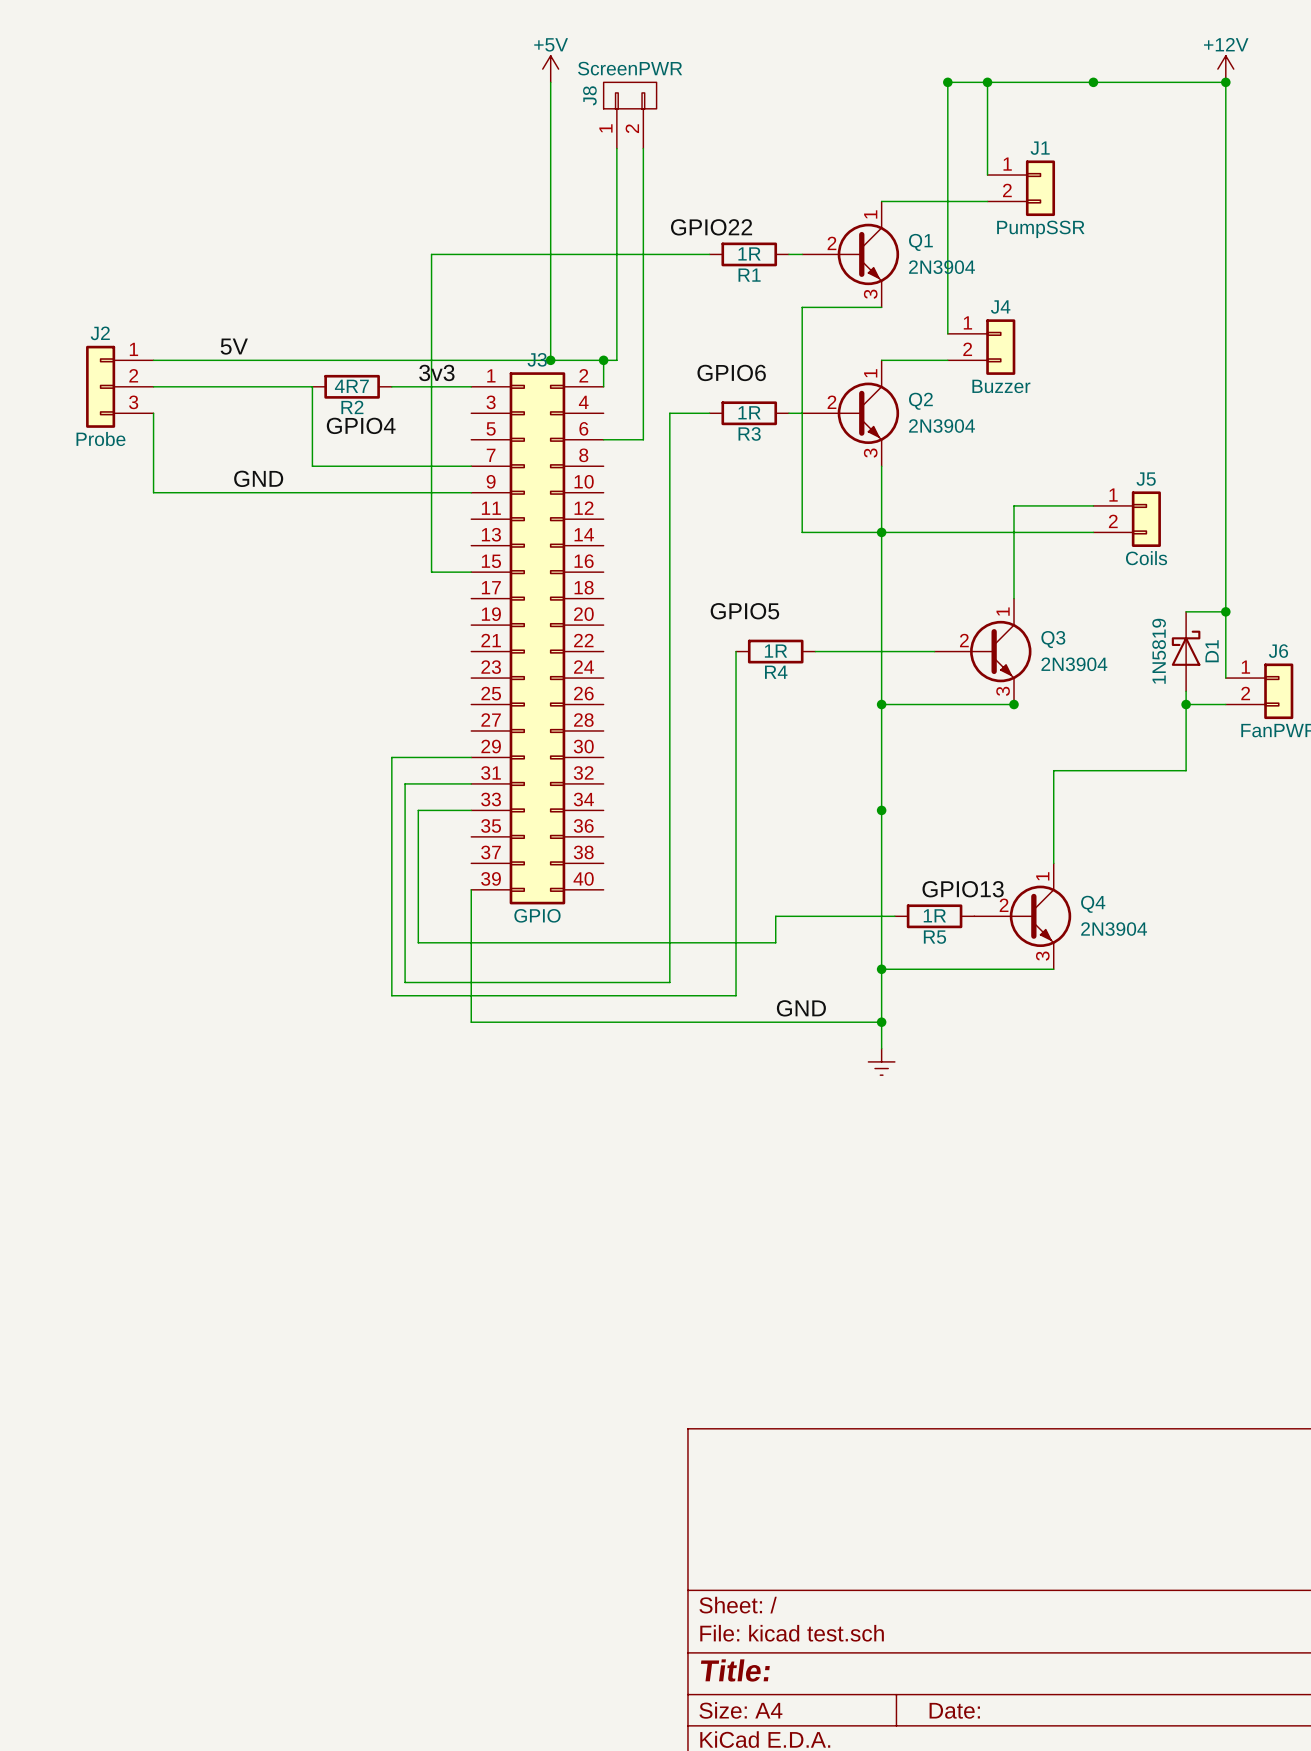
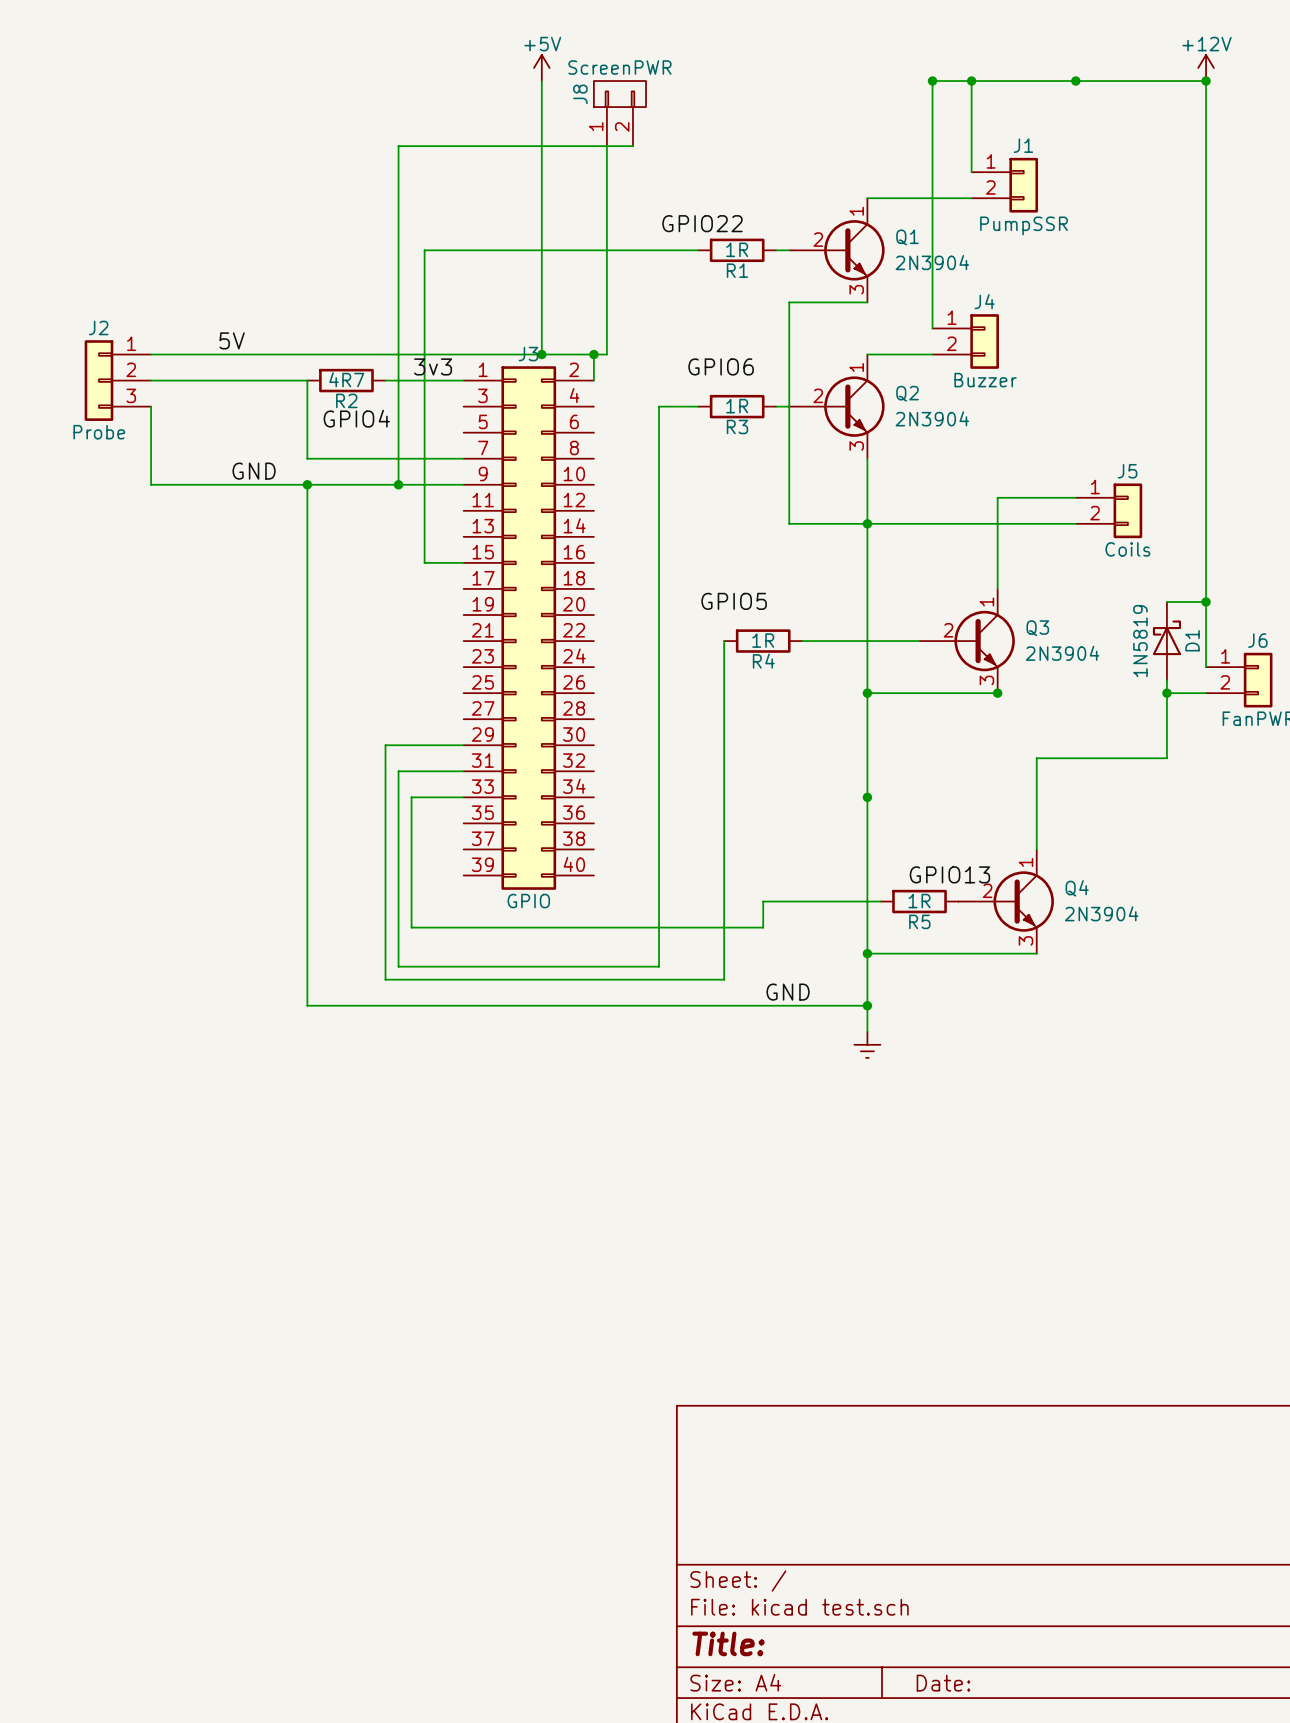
wire: (643, 148) (643, 439) (603, 439) -> (632, 146) (398, 146) (398, 484)
junction: none -> (307, 484)
junction: none -> (398, 484)
wire: (471, 889) (471, 1022) -> (307, 484) (307, 1005) (463, 1005)

